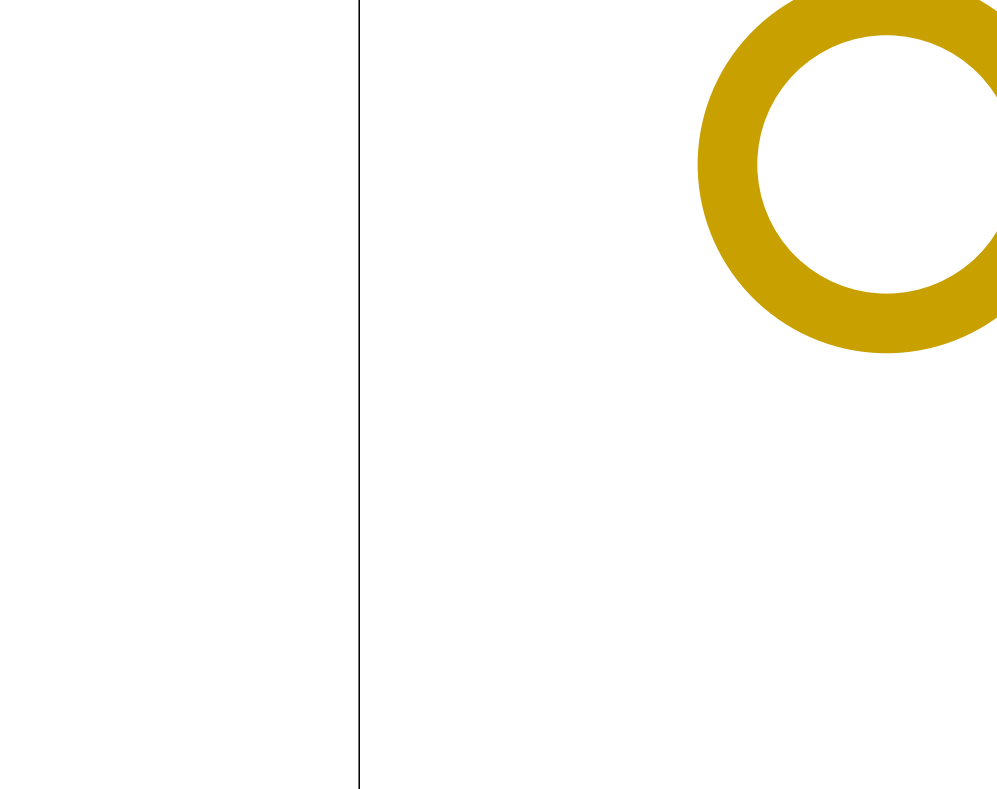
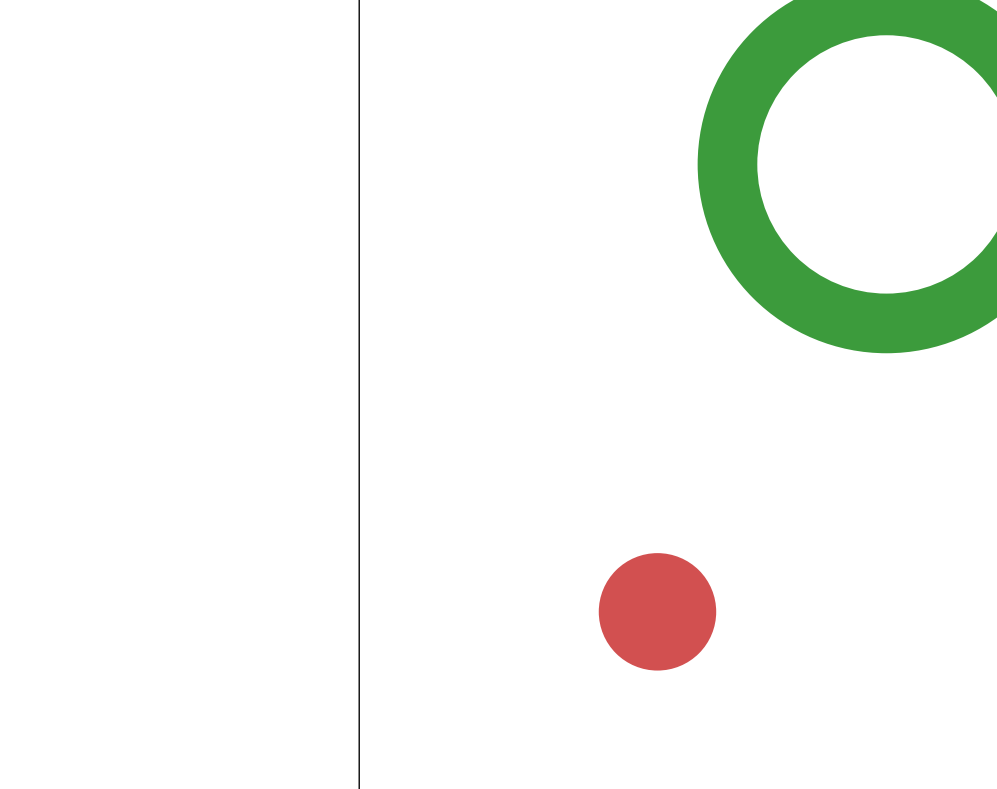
part: none -> (657, 611)

